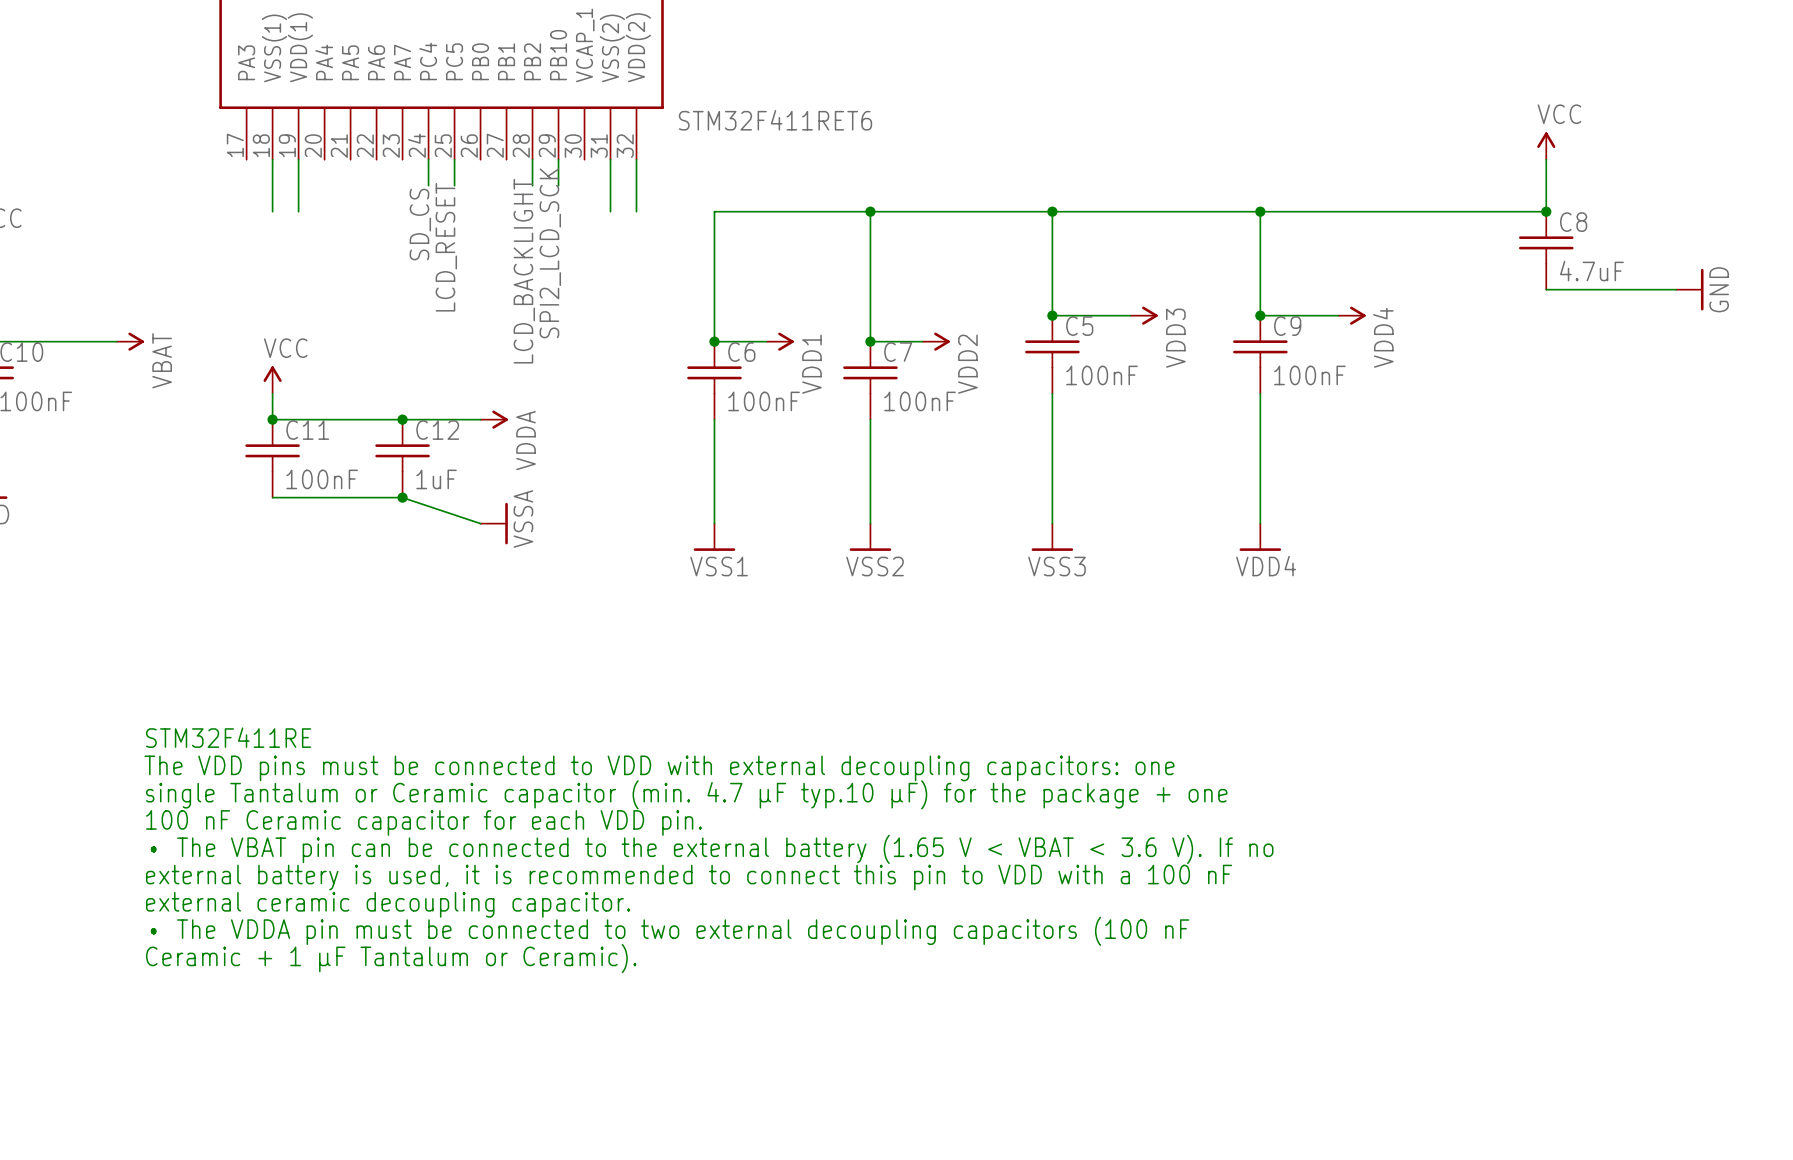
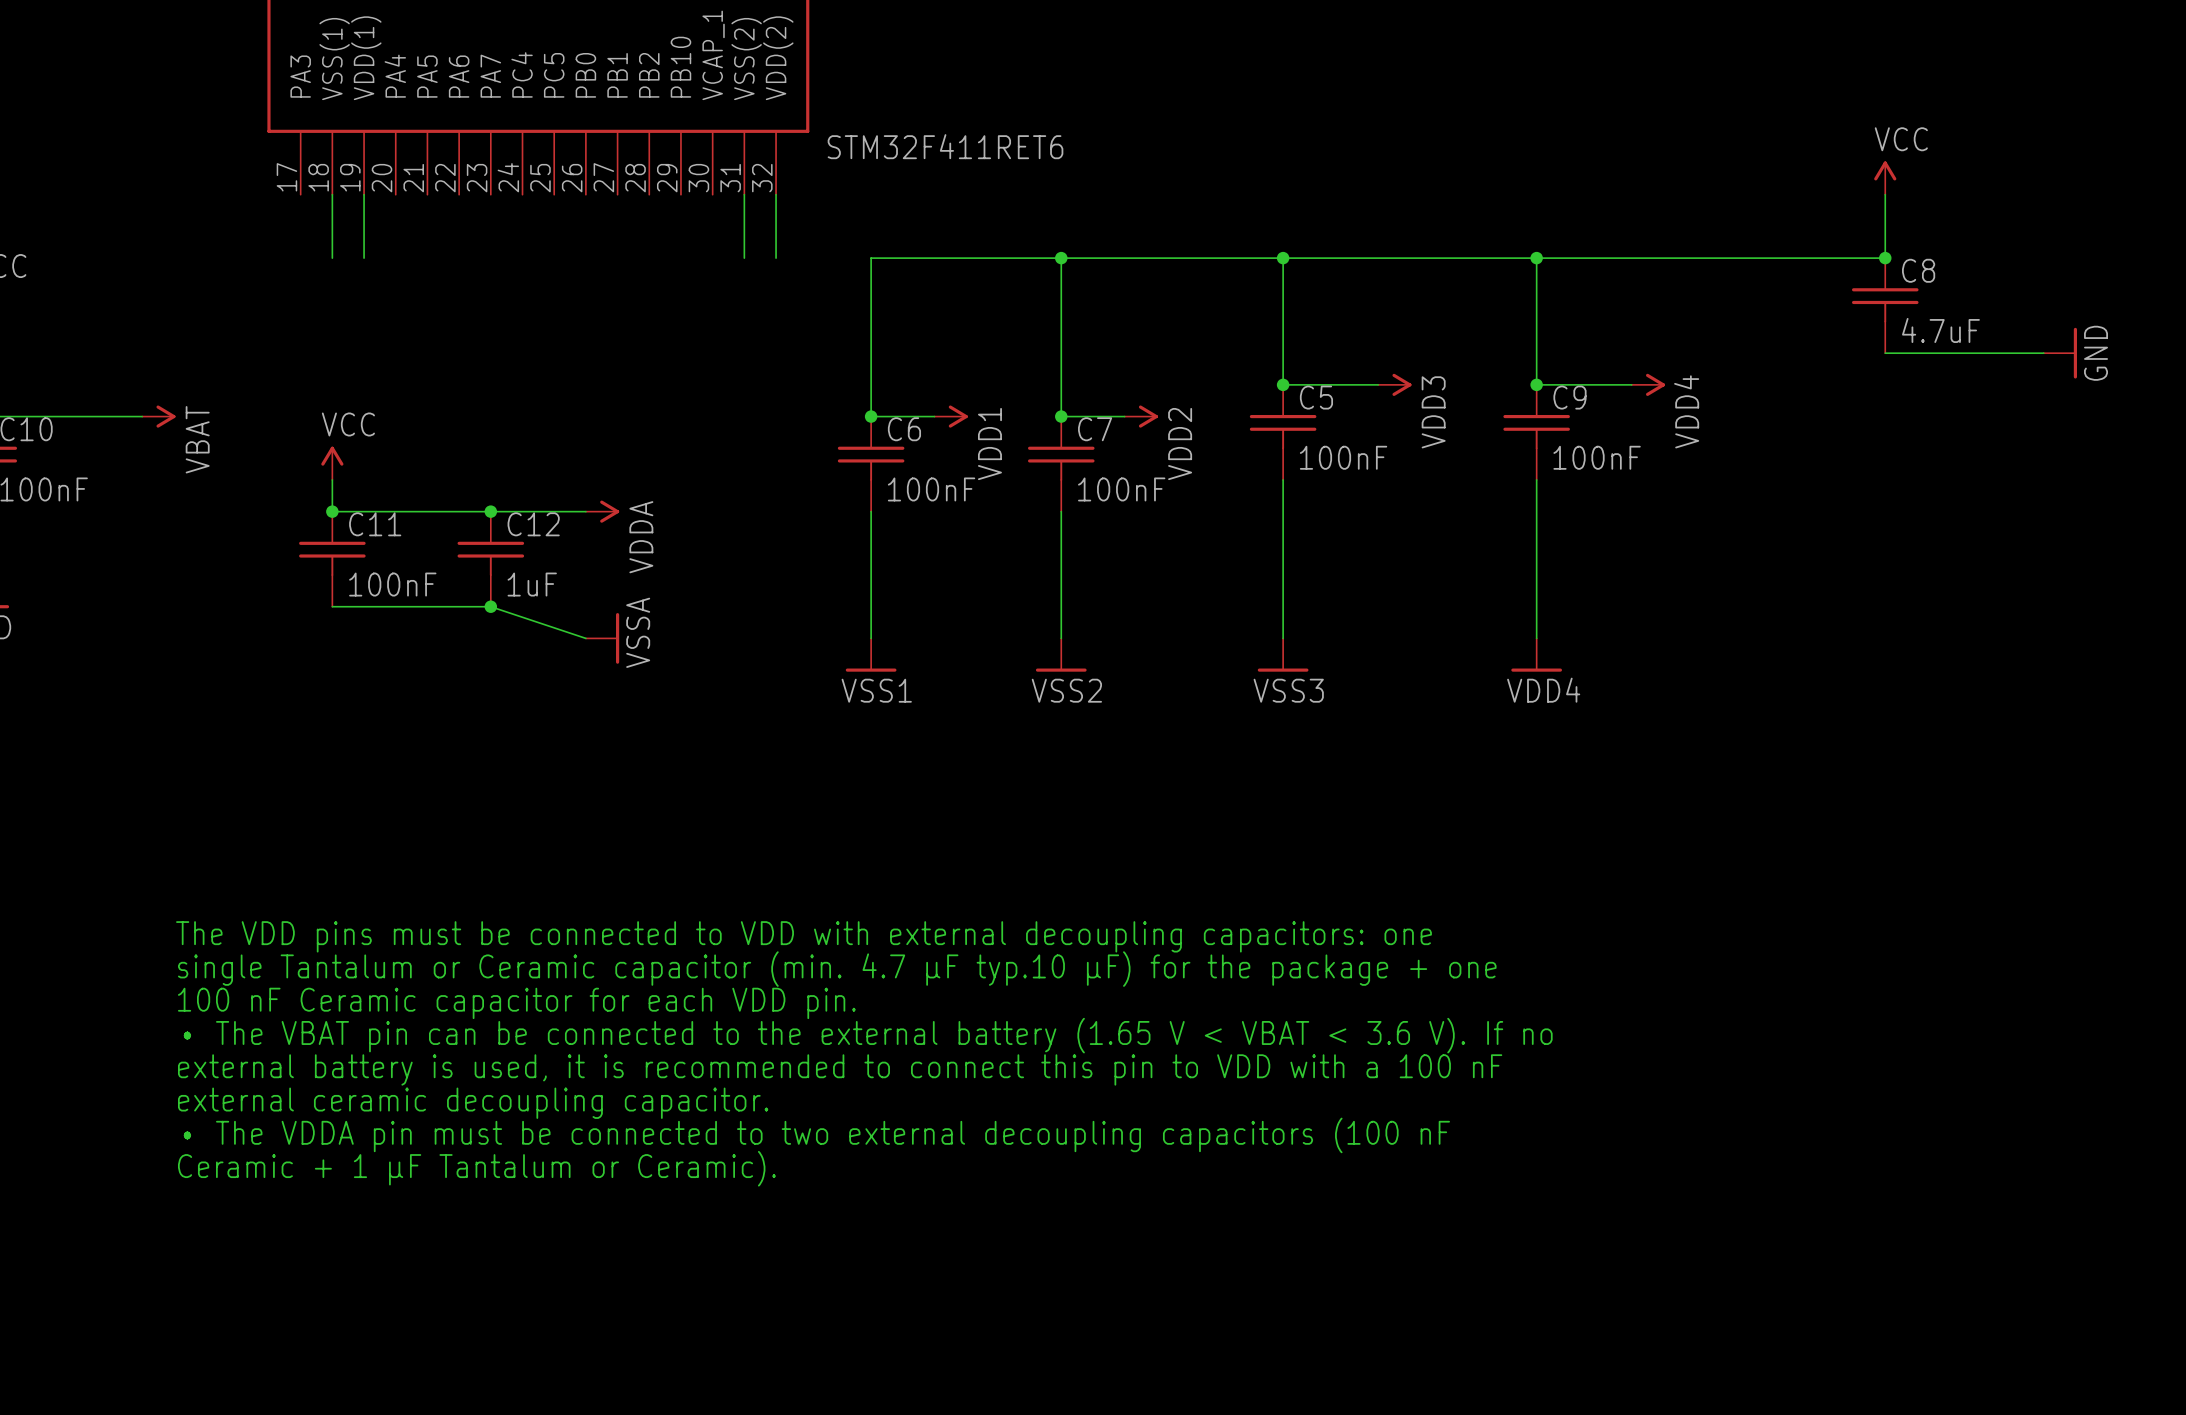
wire: (428, 159) (428, 185) -> none
wire: (454, 159) (454, 185) -> none
wire: (532, 159) (532, 185) -> none
wire: (558, 159) (558, 185) -> none
label: SD_CS (420, 224) -> none
label: LCD_RESET (446, 247) -> none
label: SPI2_LCD_SCK (550, 253) -> none
label: LCD_BACKLIGHT (524, 271) -> none
text: STM32F411RE (228, 737) -> none

